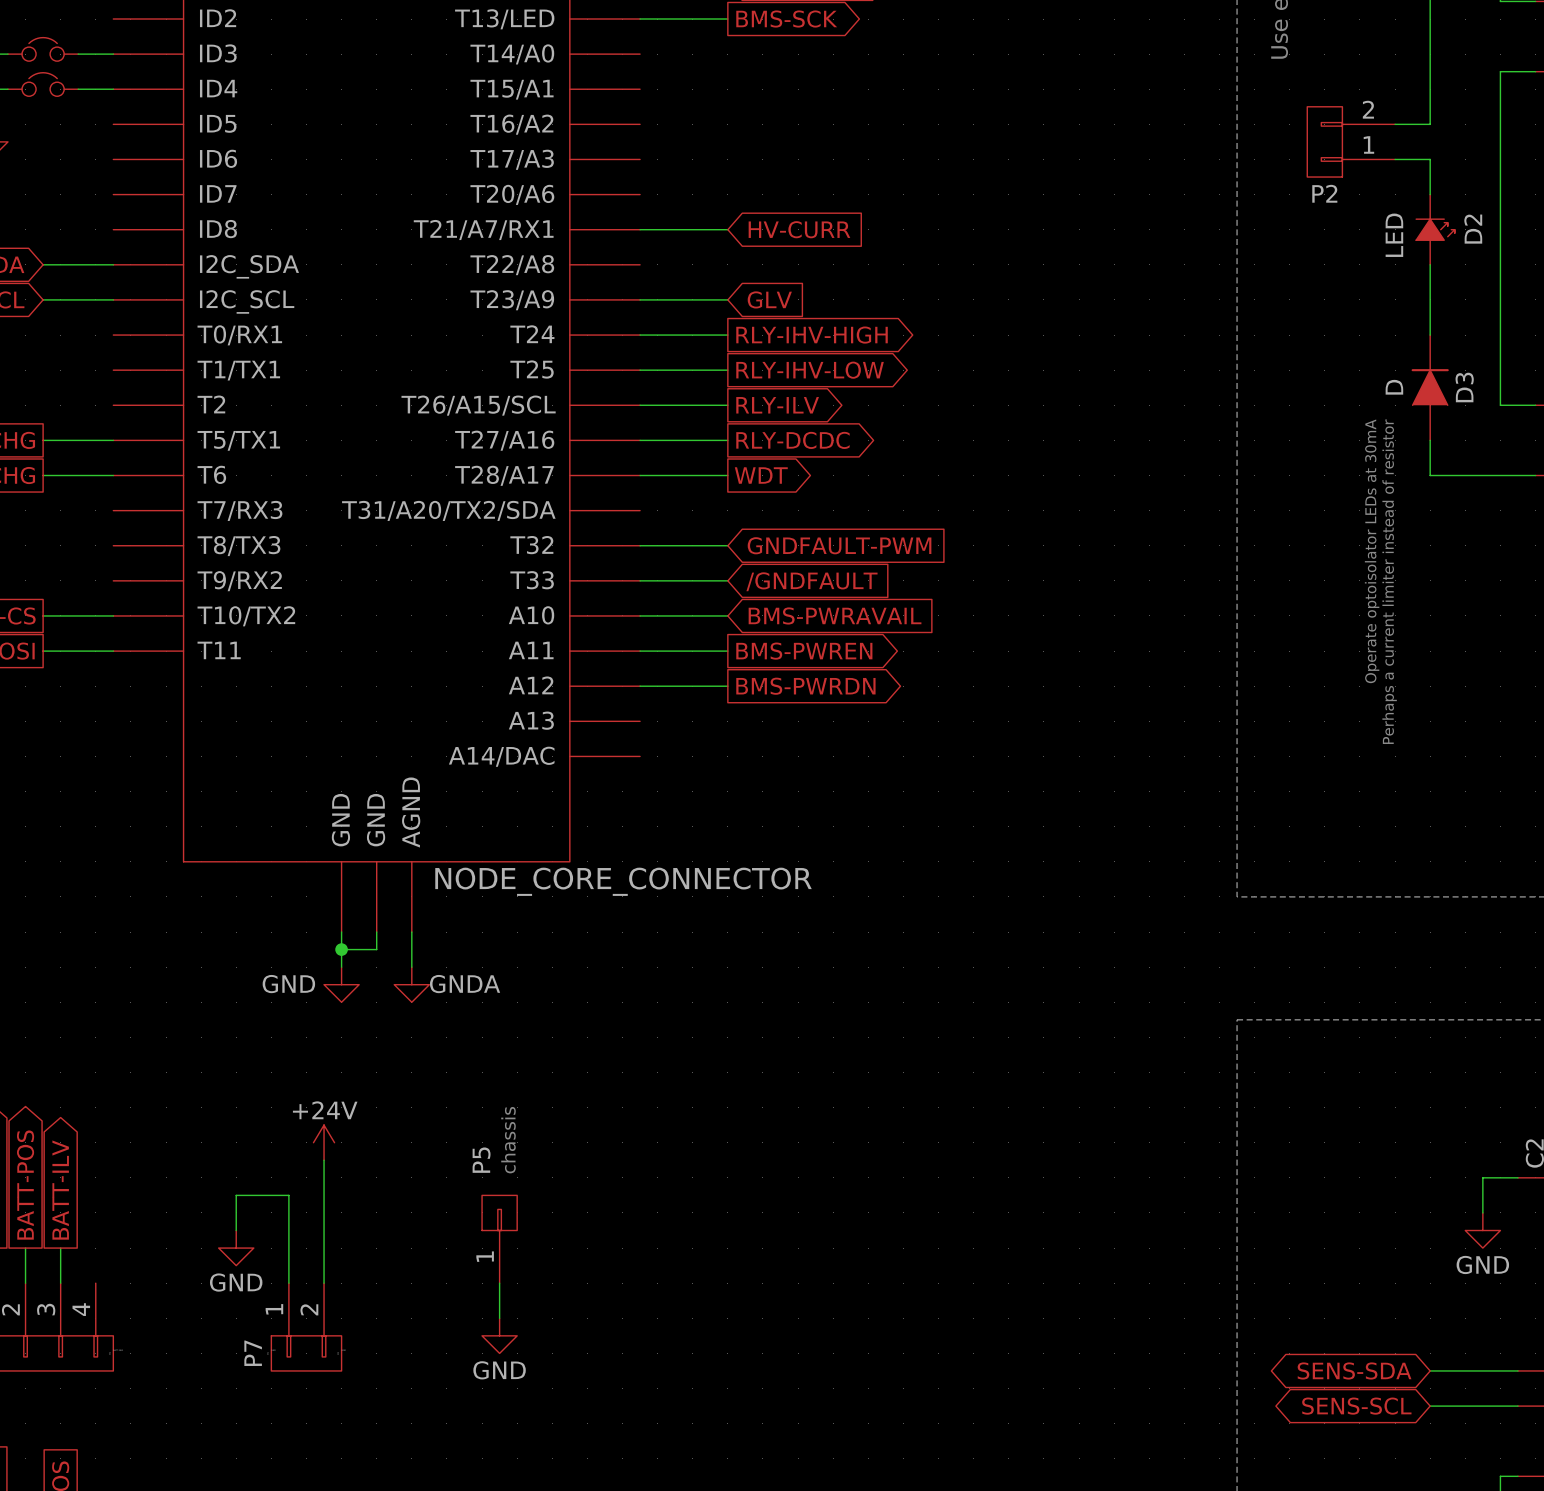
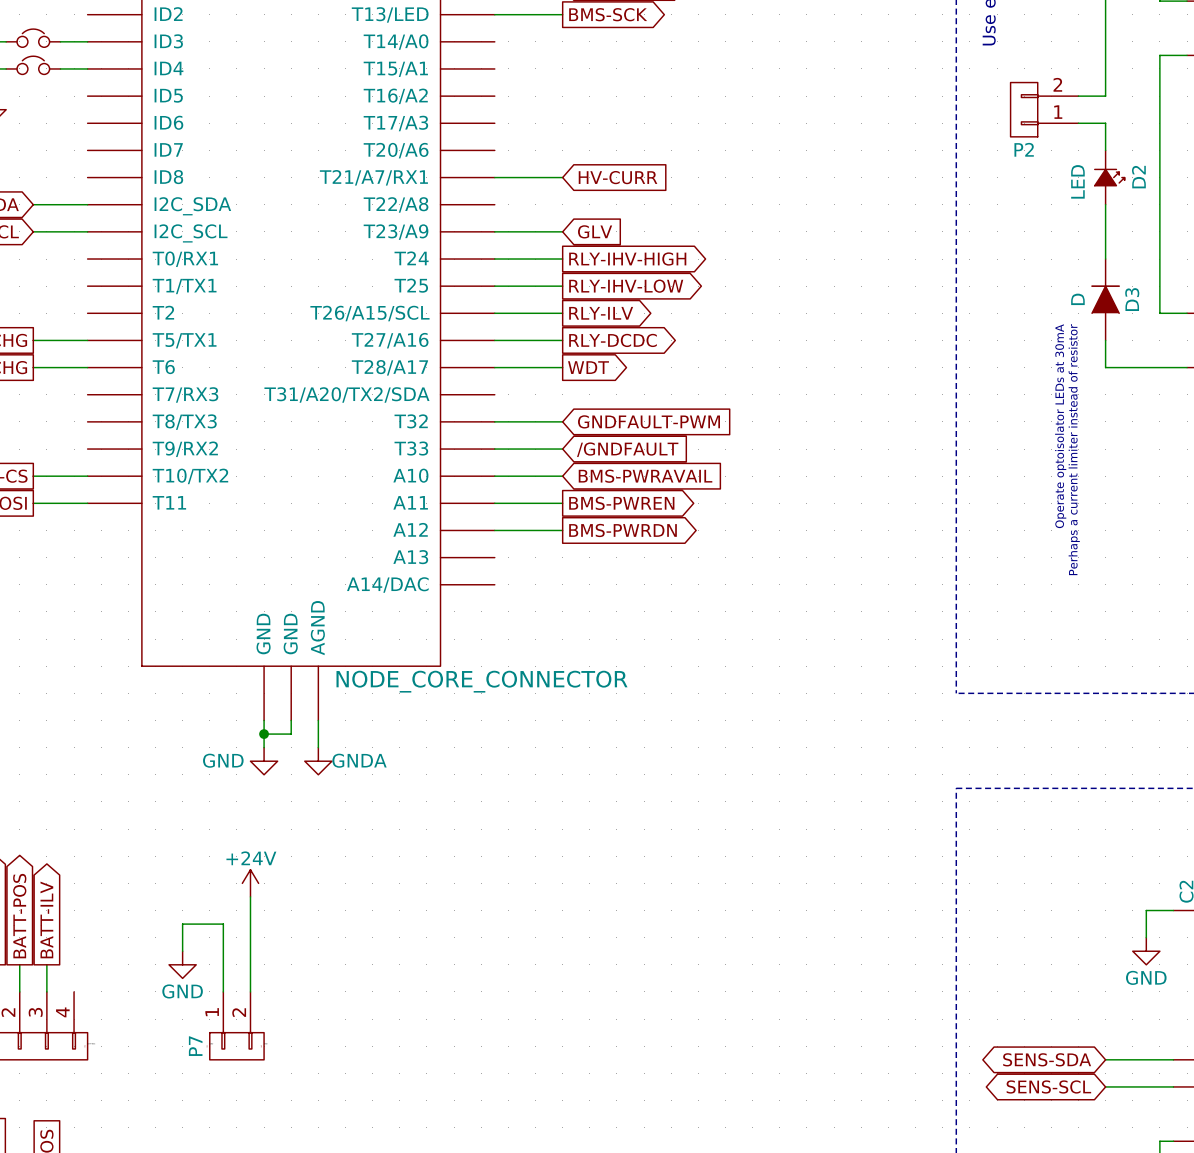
text: chassis (508, 1140) -> none
P5: (499, 1239) -> none
wire: (499, 1283) (499, 1318) -> none
power symbol: GND (499, 1335) -> none

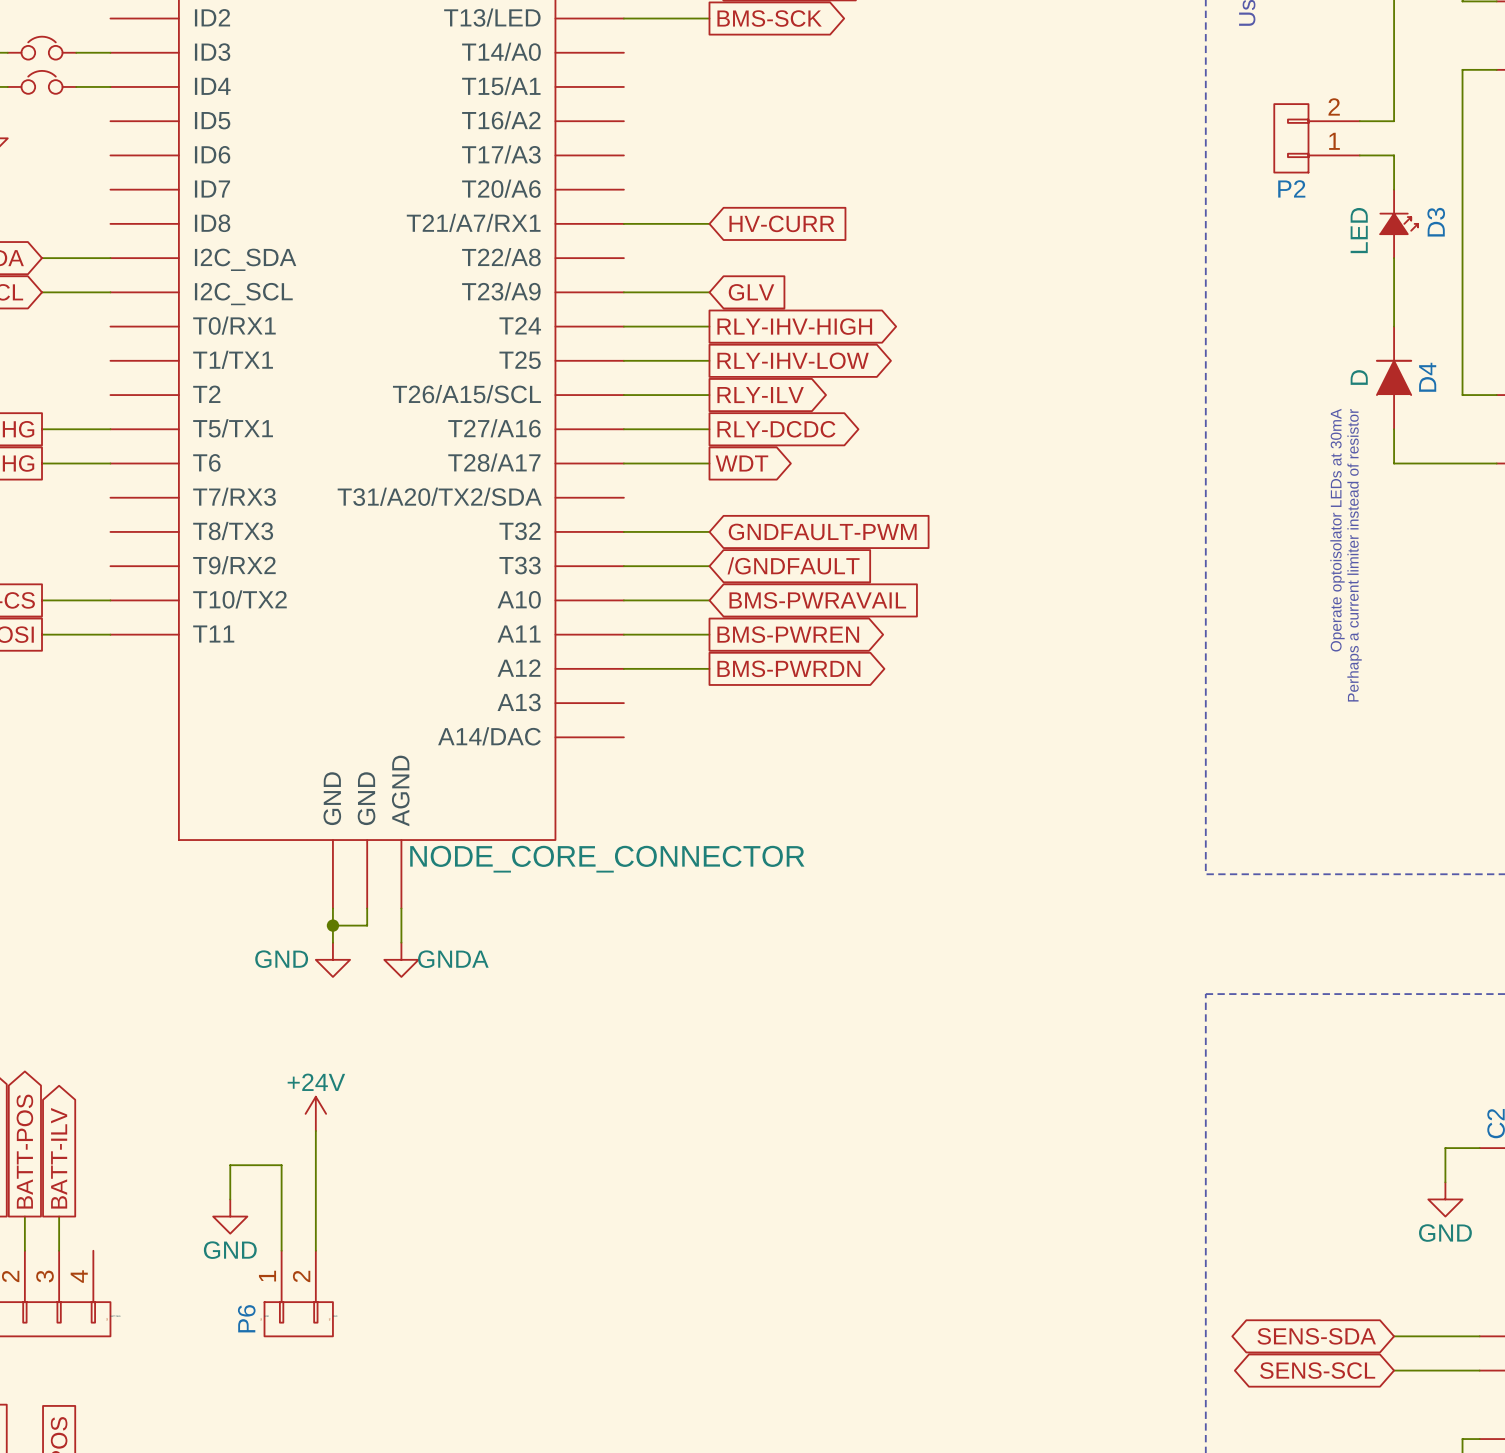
D2 name: D2 (1138, 177) -> D3 (1436, 222)
D3 name: D3 (1132, 299) -> D4 (1427, 377)
P7 name: P7 (195, 1046) -> P6 (246, 1318)

